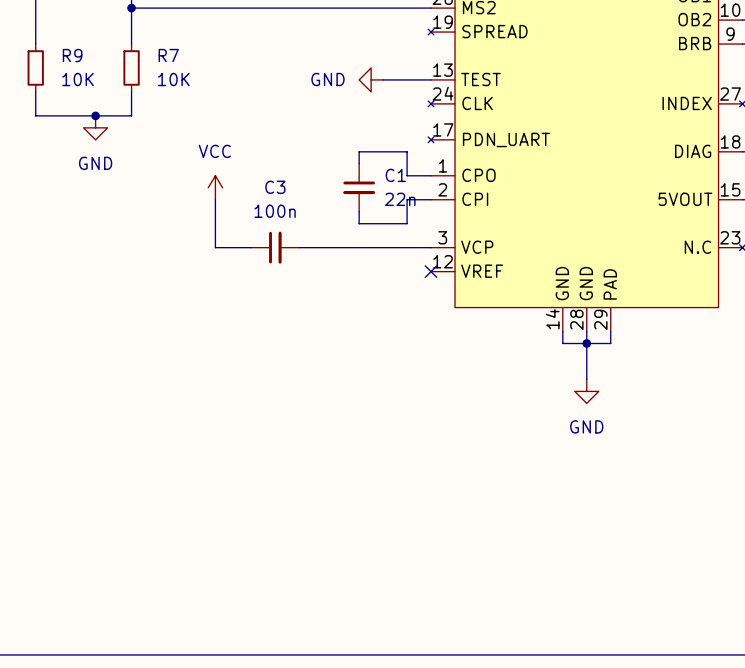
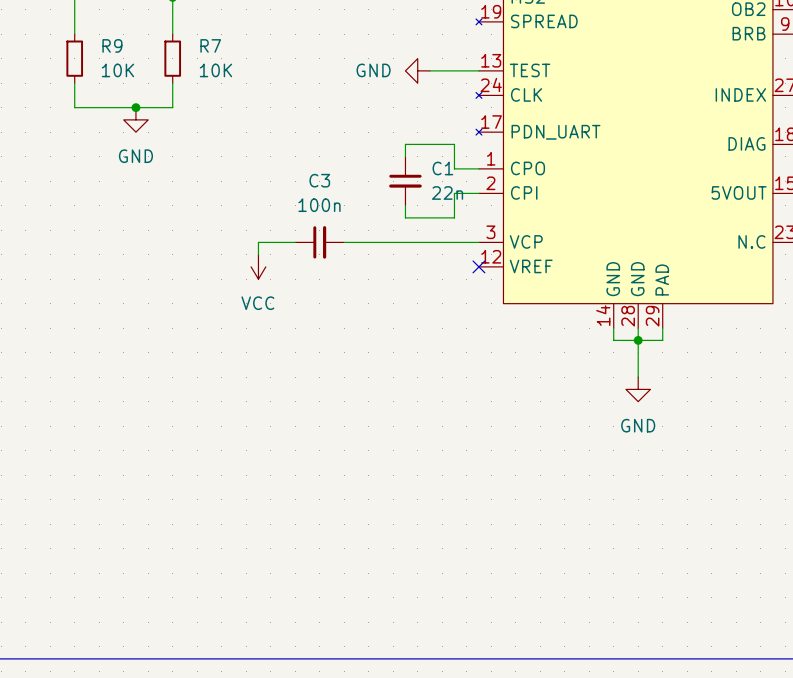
power symbol rotation: 0° (215, 187) -> 180° (258, 266)
power symbol position: VCC (215, 187) -> VCC (258, 266)
wire: (215, 199) (215, 247) -> (258, 254) (258, 242)

